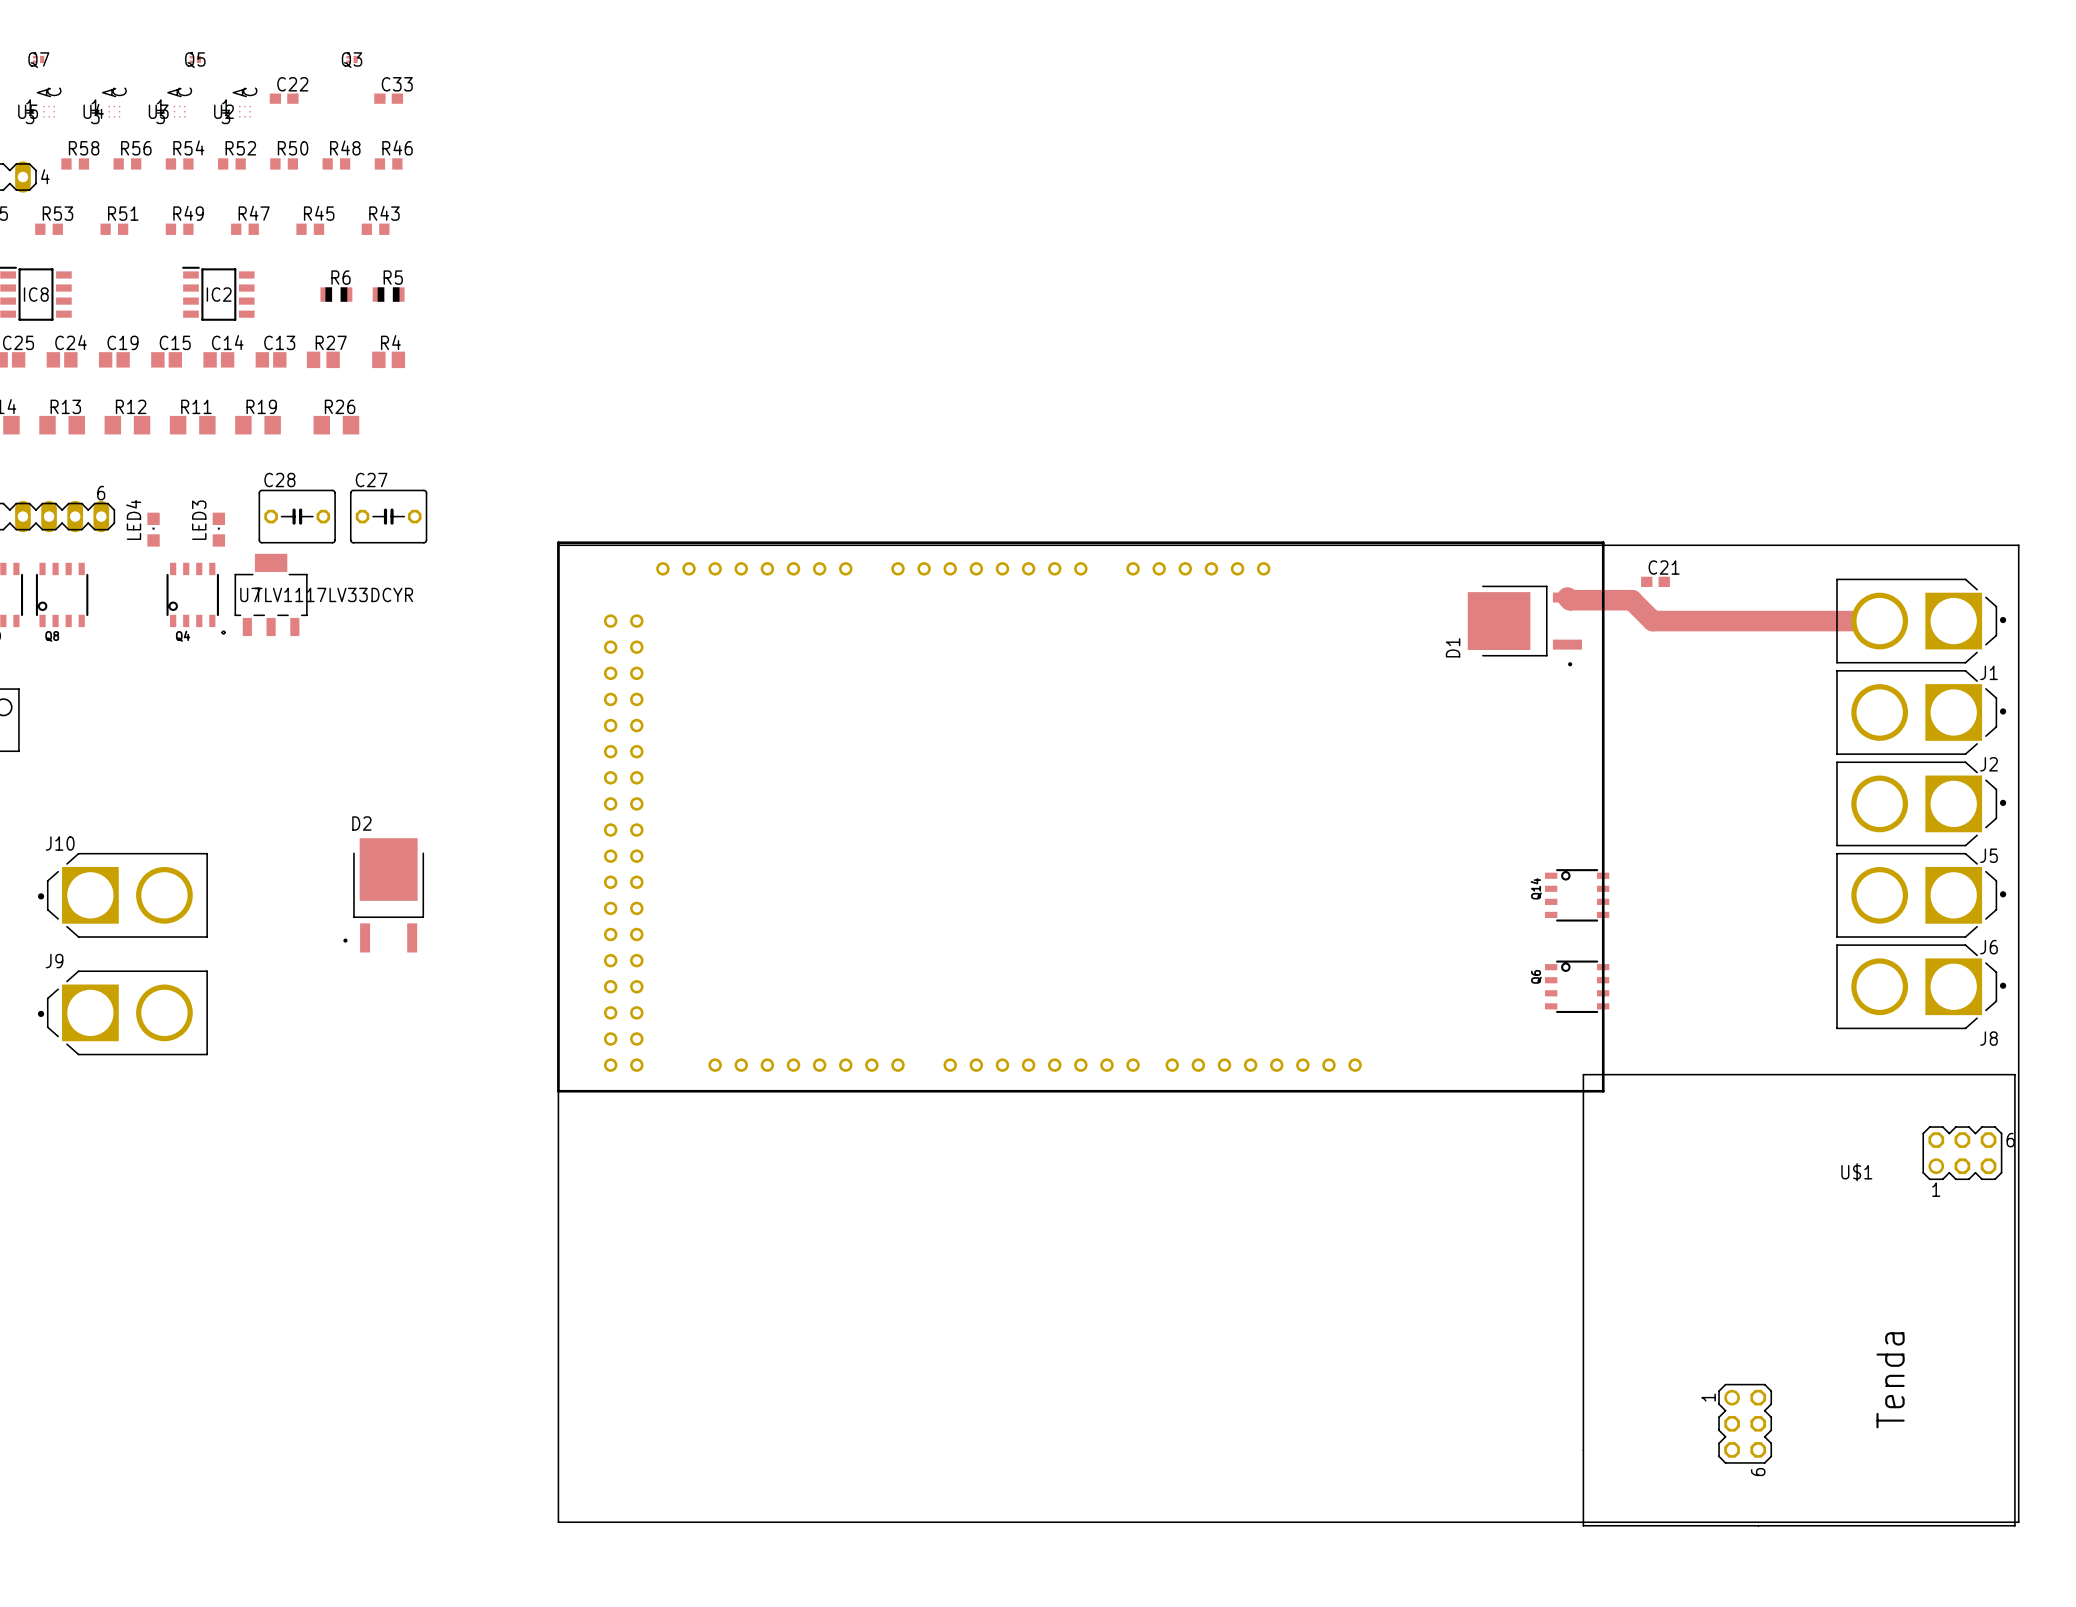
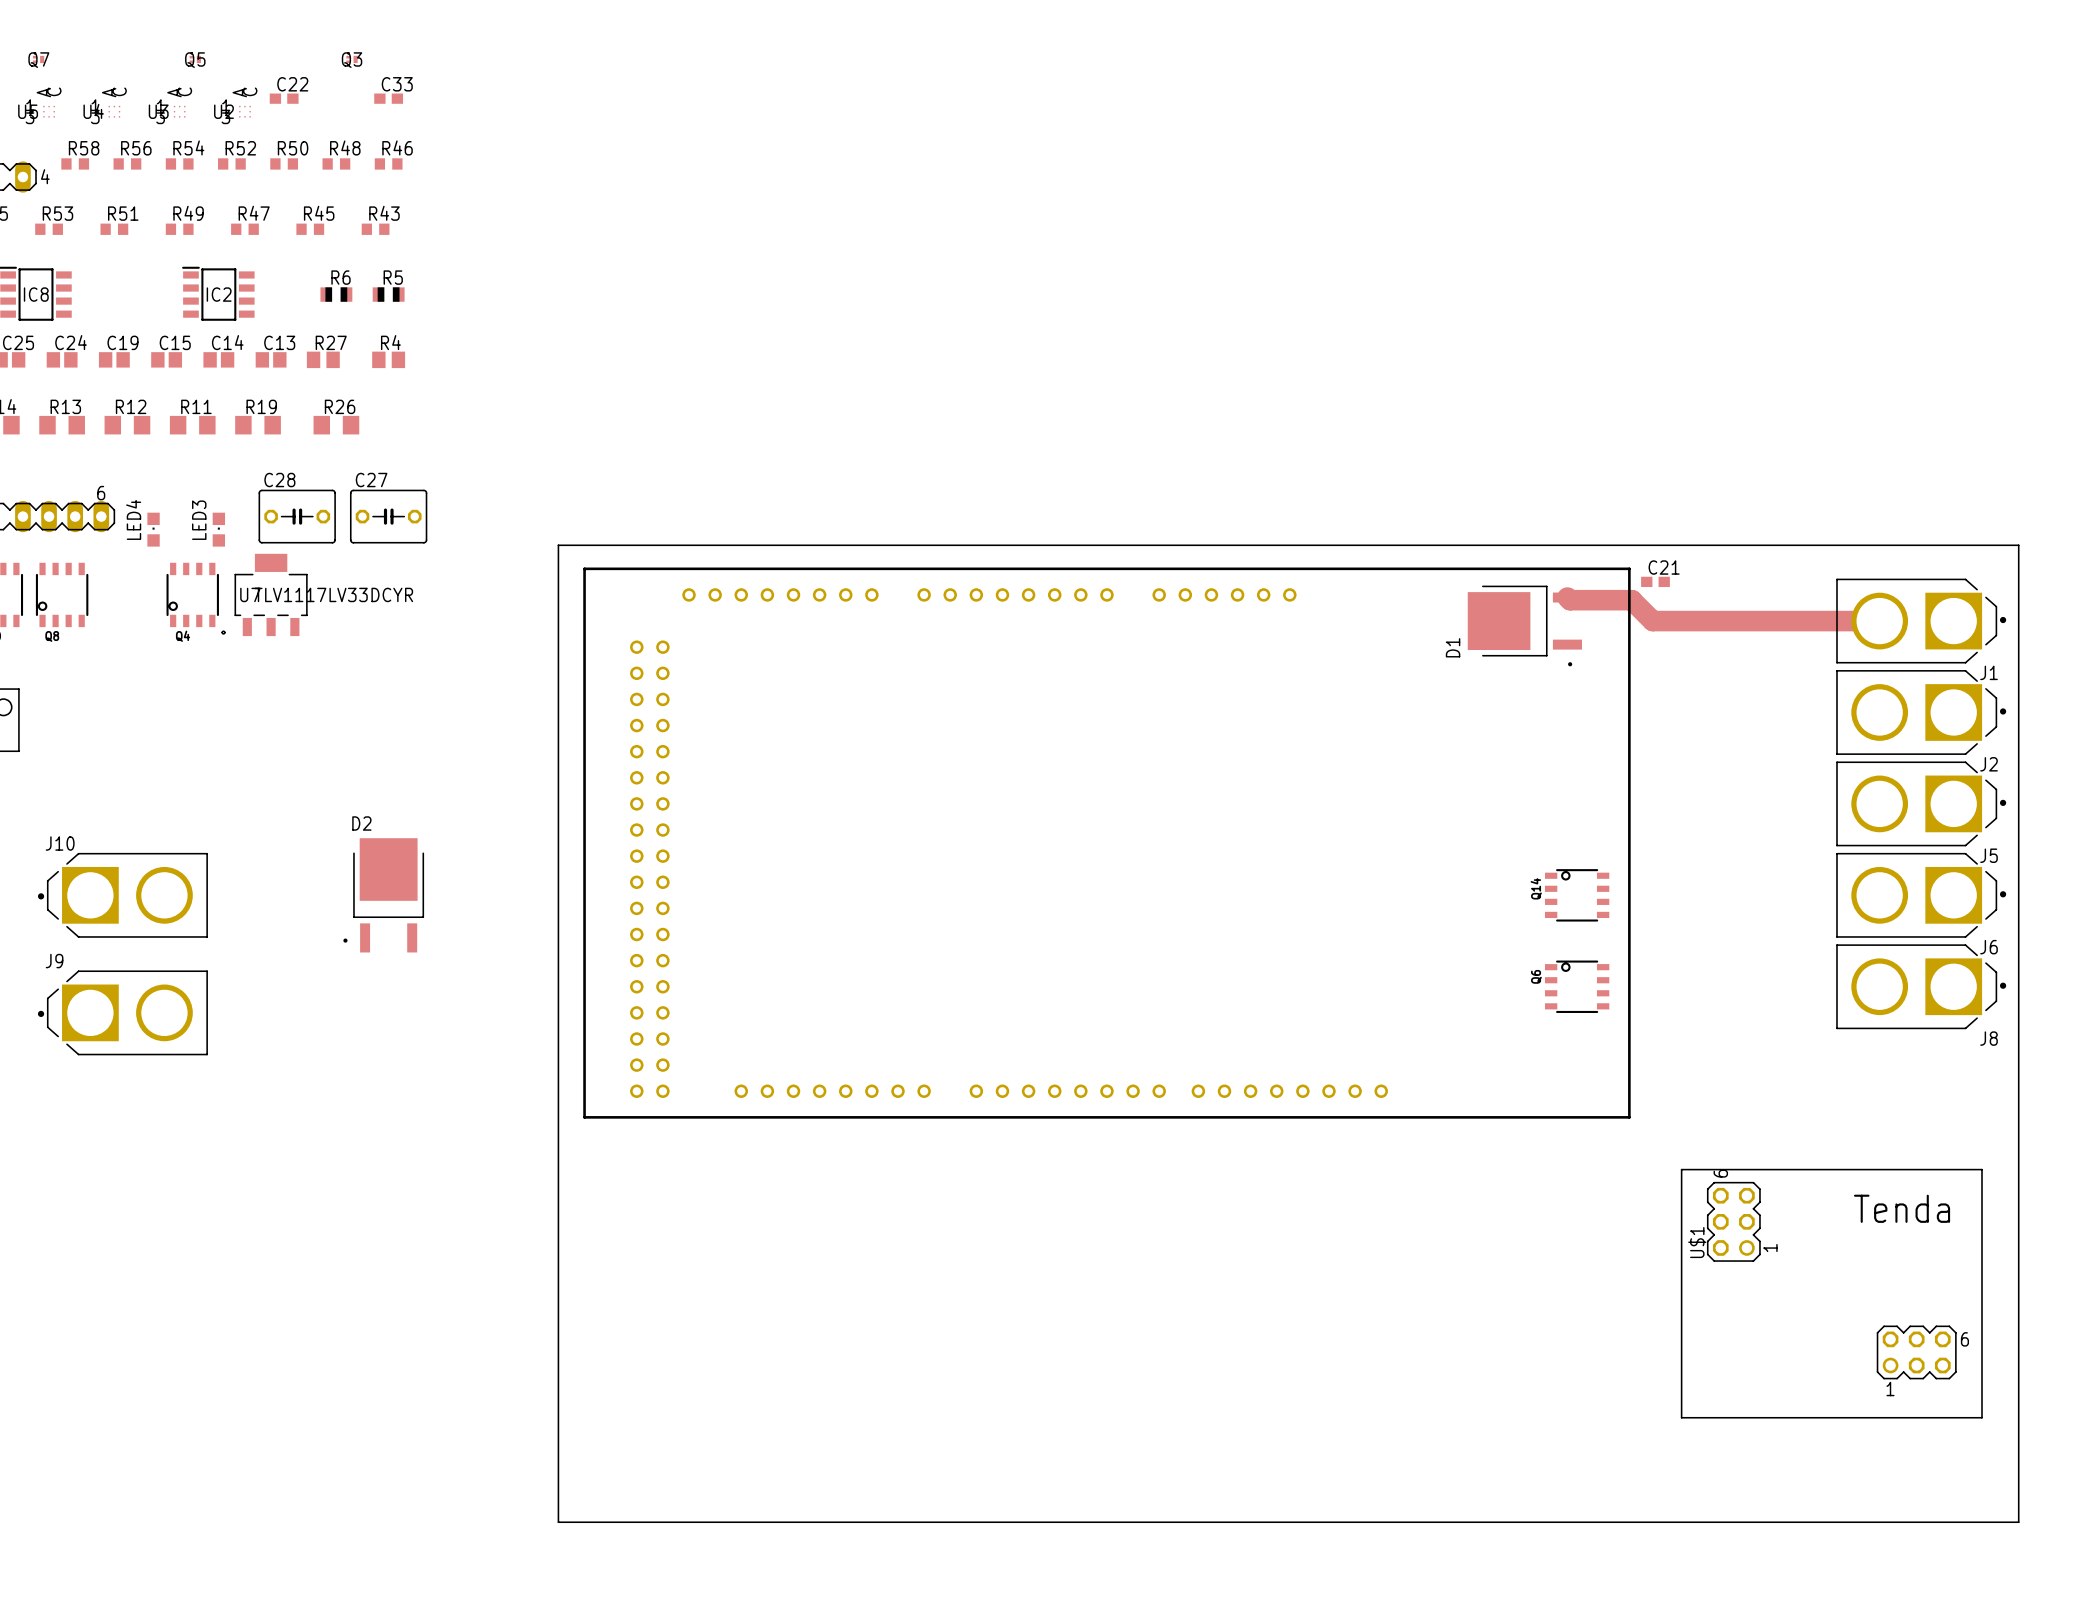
part position: (1080, 816) -> (1106, 843)
U$1 footprint: [1582, 1074, 2016, 1527] -> [1680, 1168, 1983, 1419]
U$1 name position: U$1 (1856, 1172) -> U$1 (1697, 1242)

